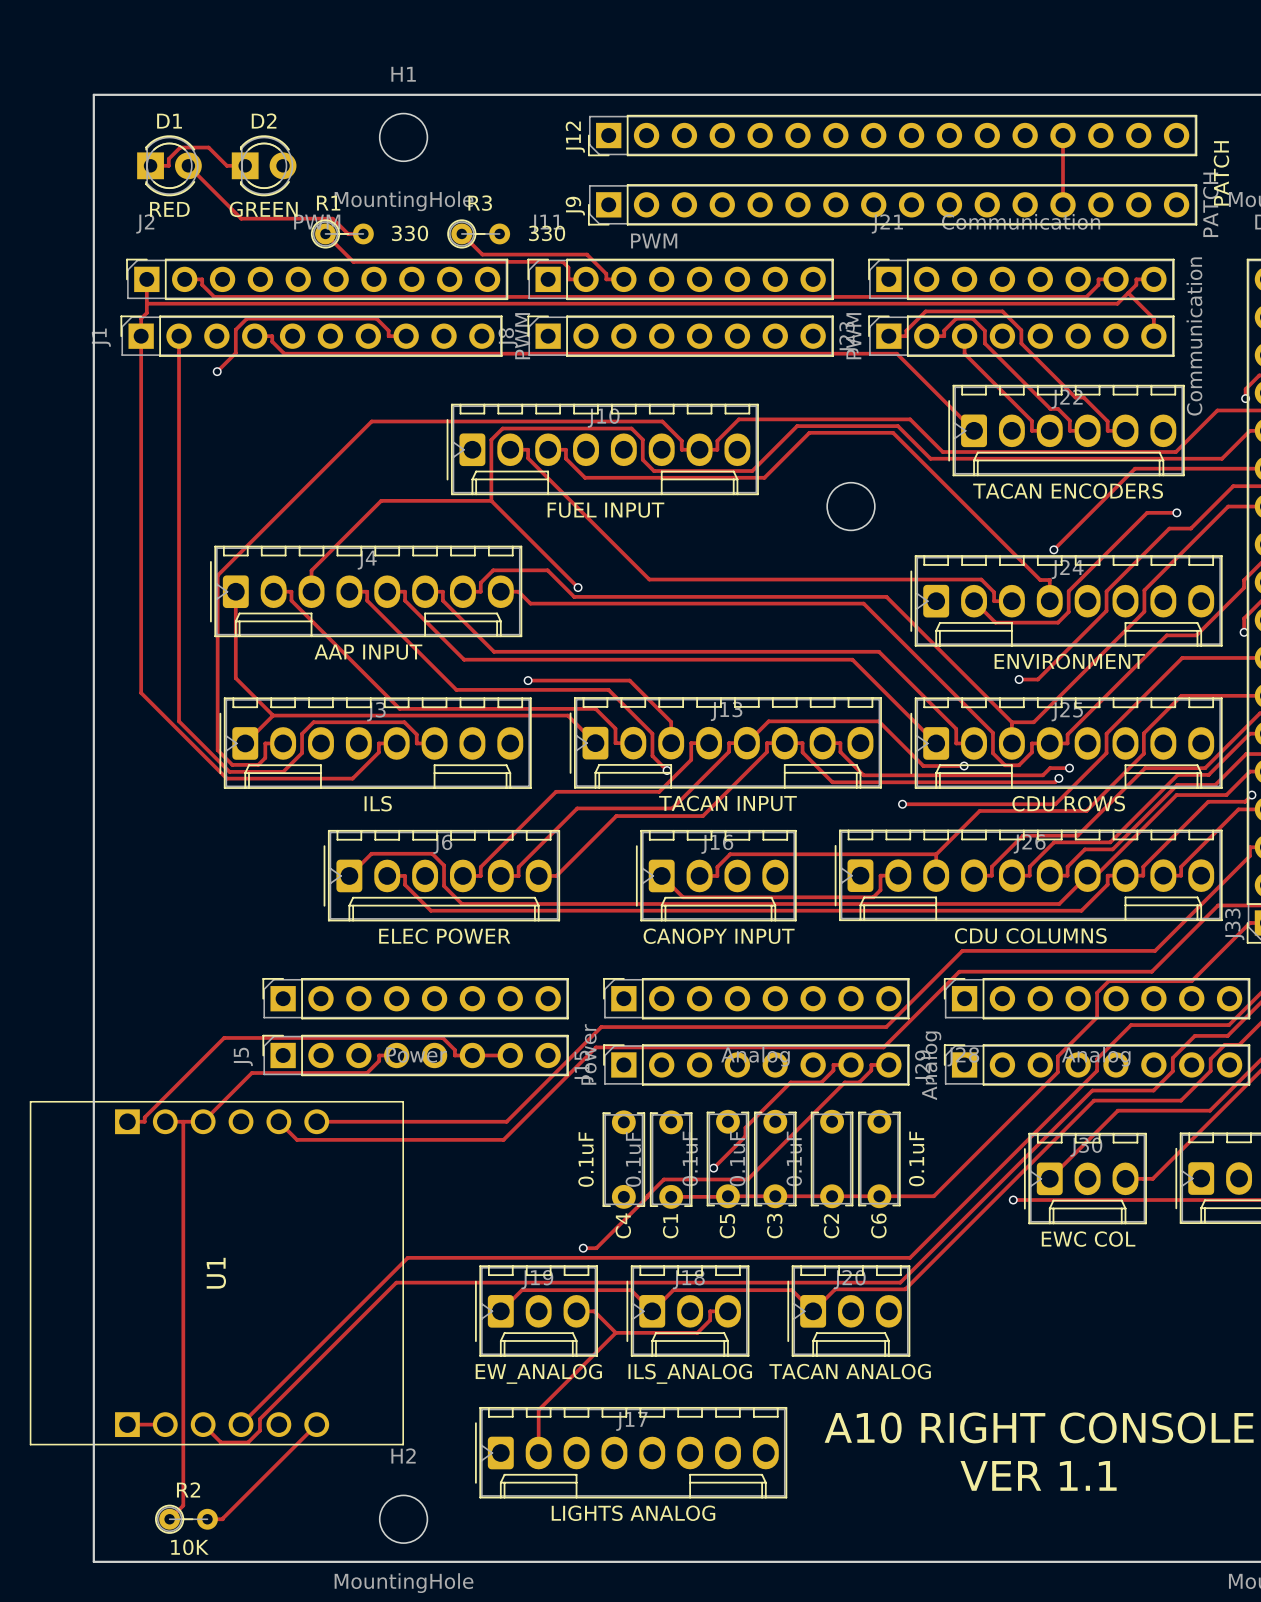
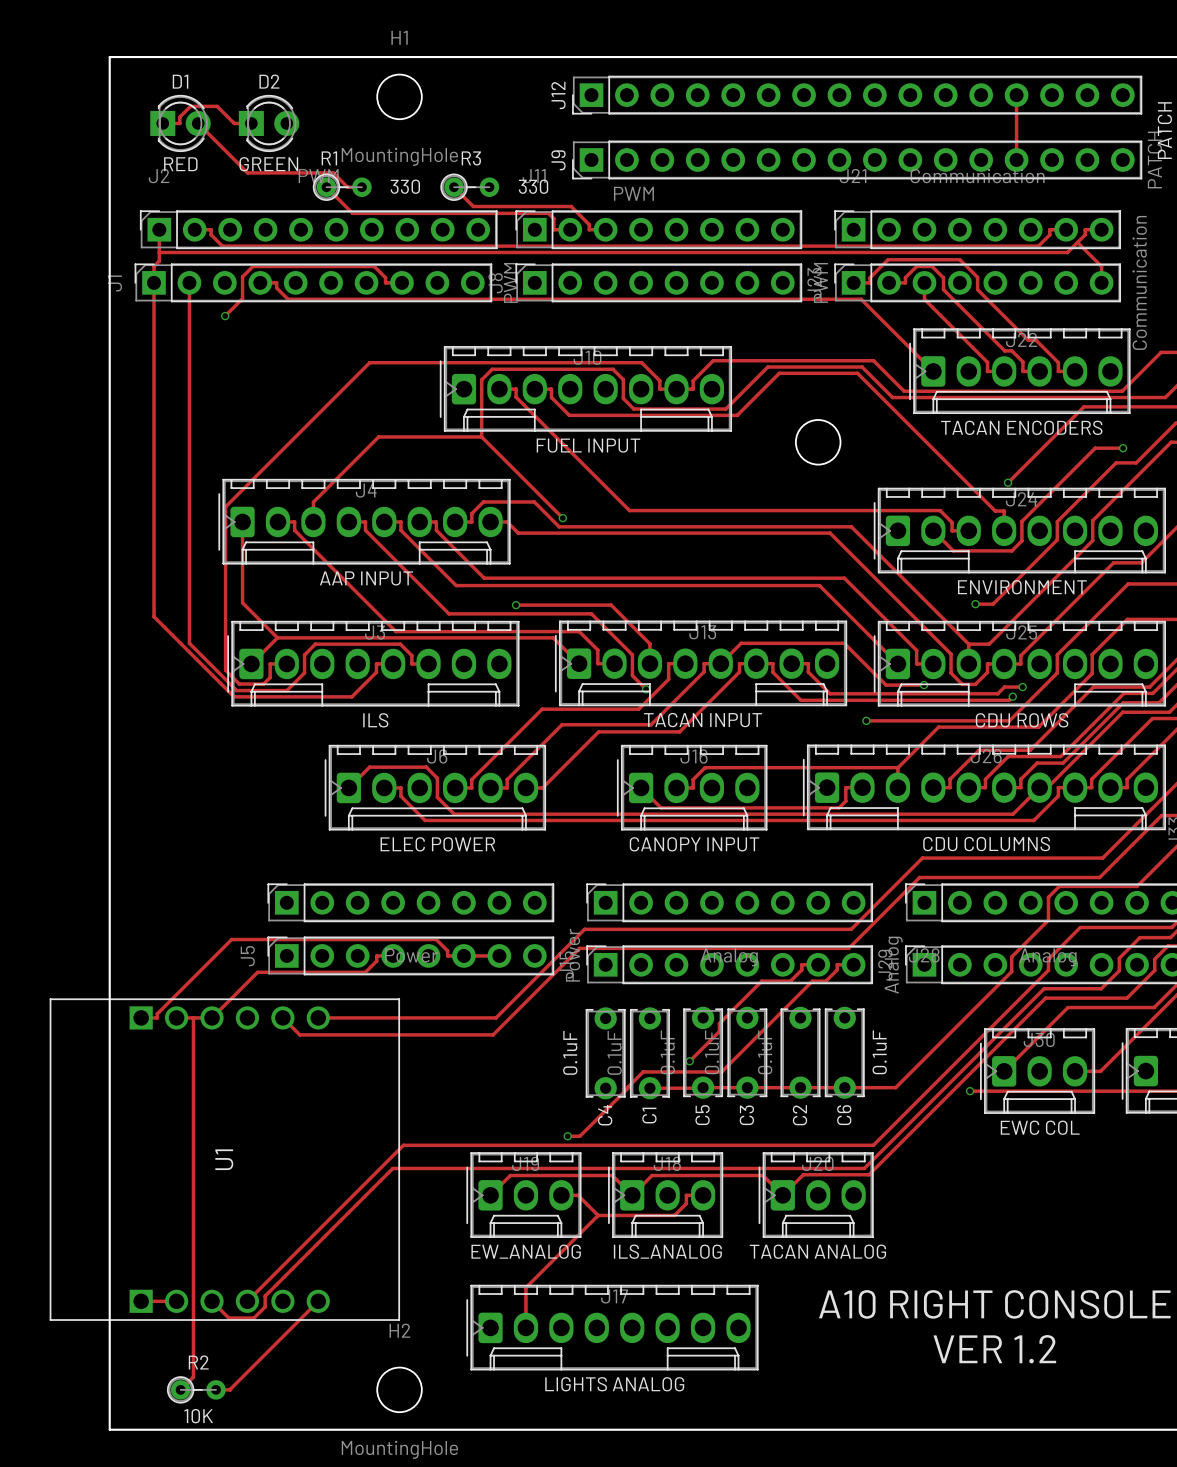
text: VER 1.1 (1038, 1475) -> VER 1.2 (994, 1349)

